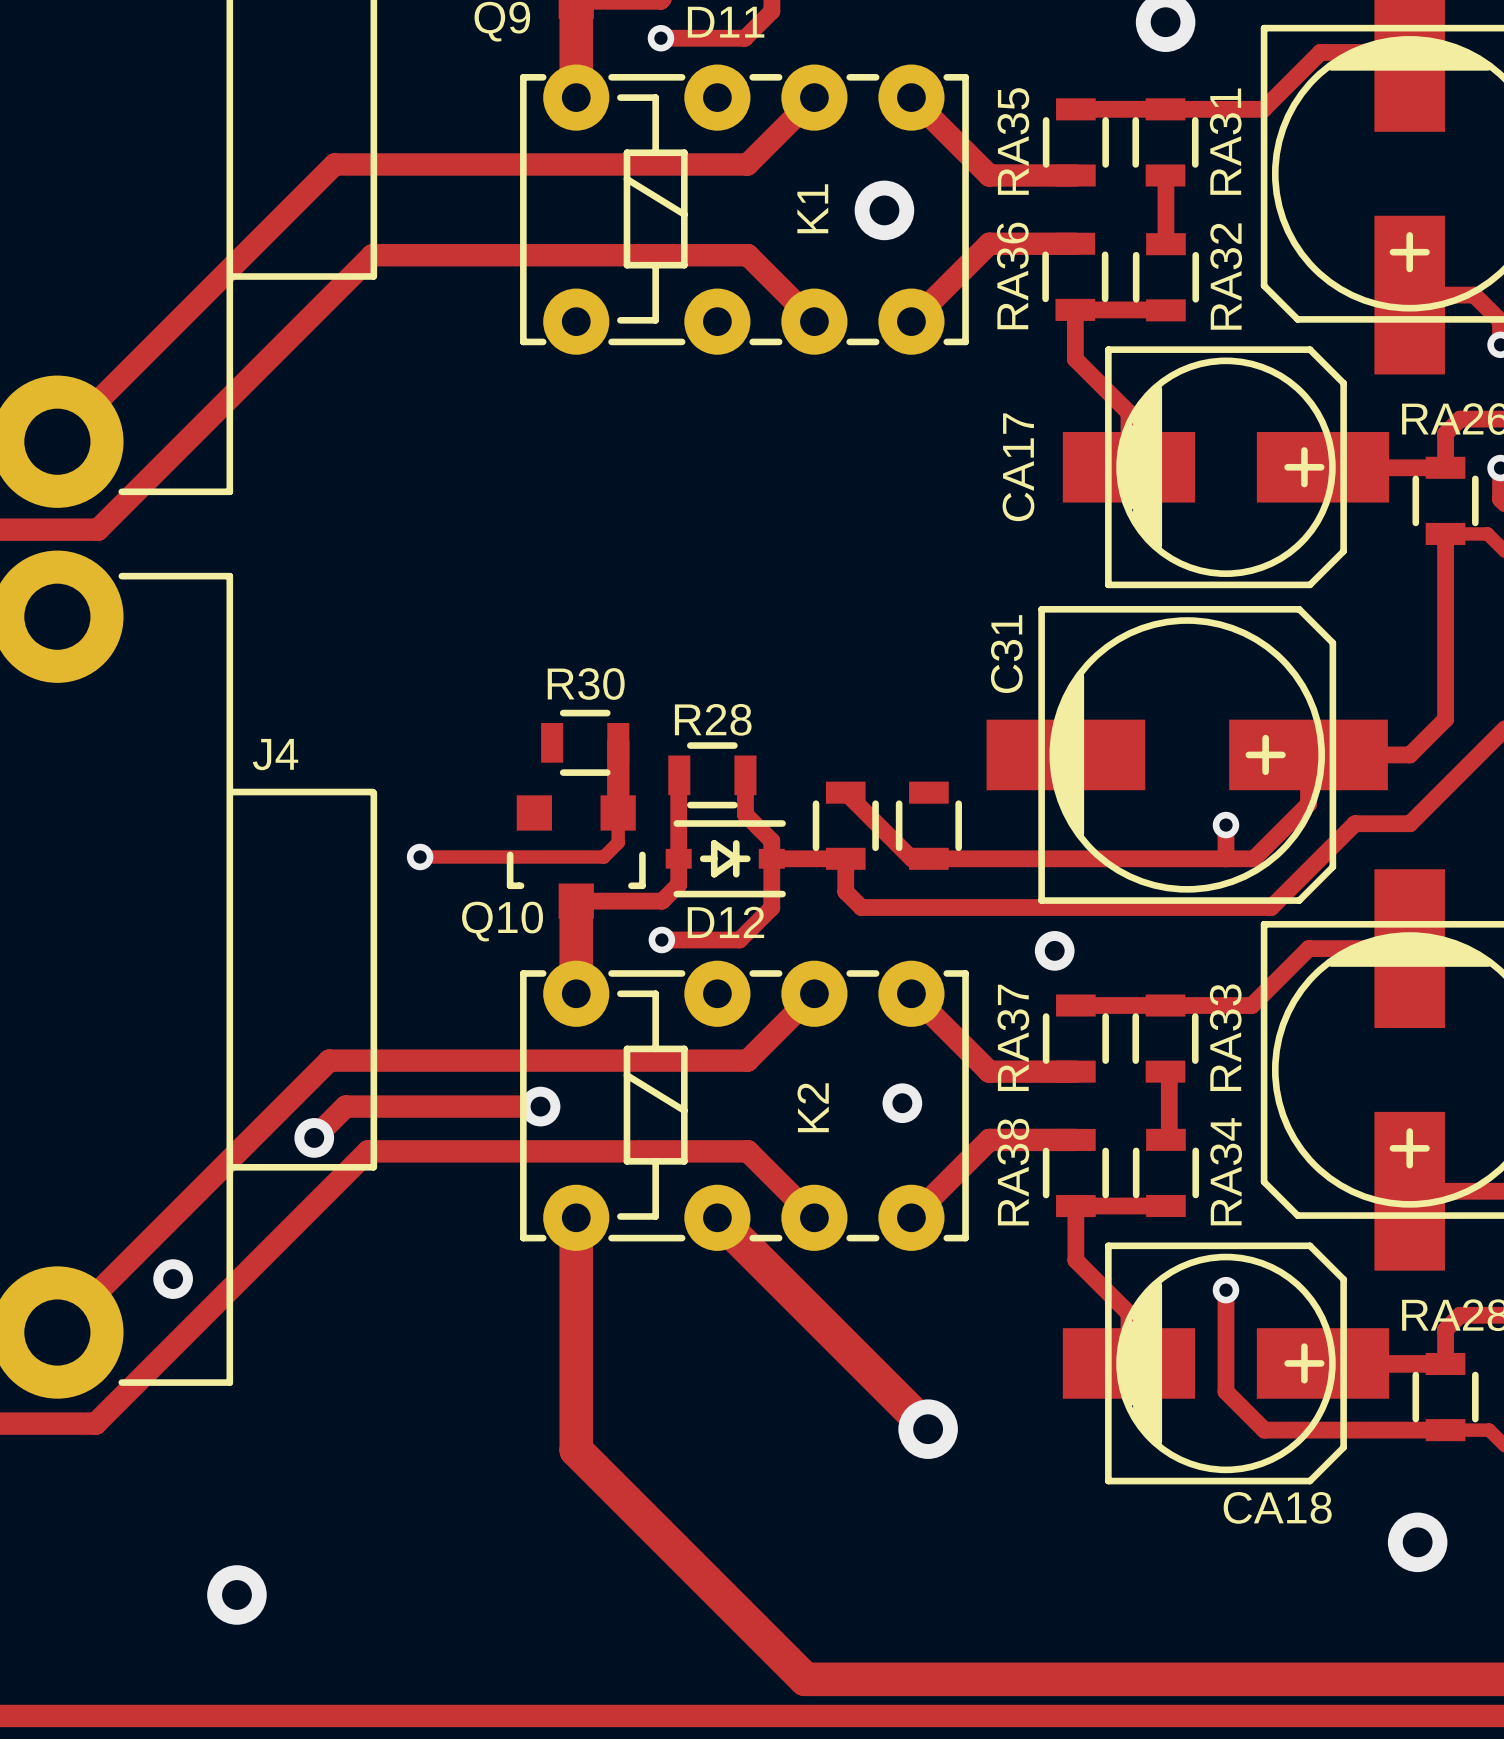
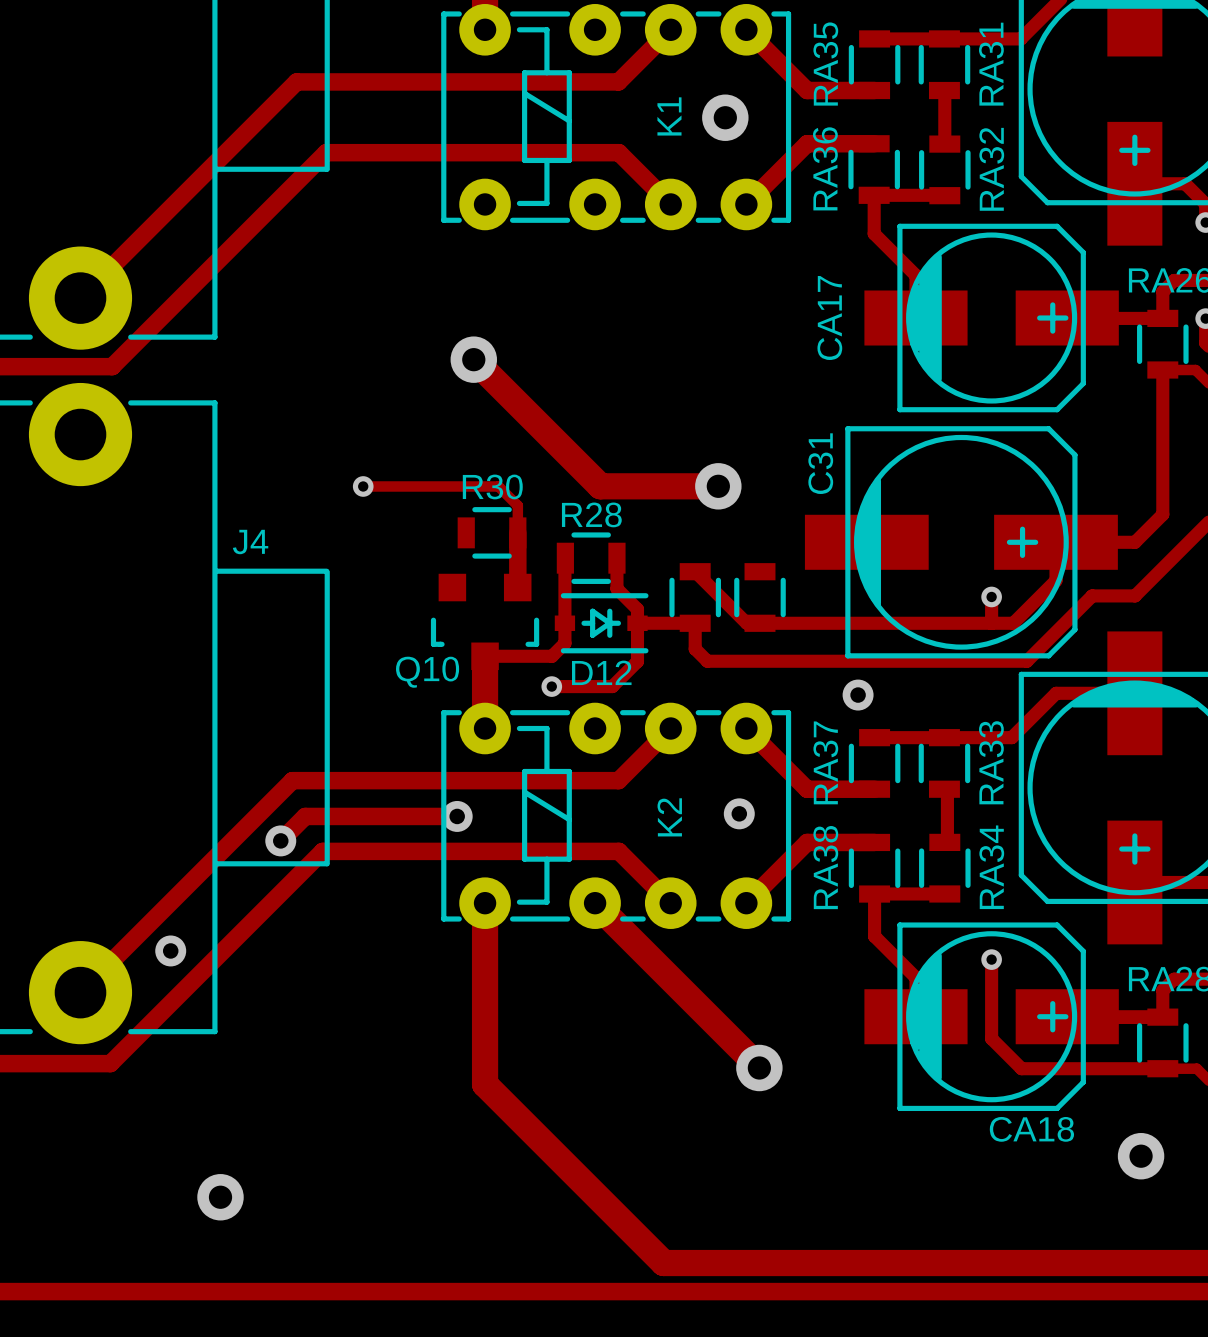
track: none -> (473, 359) (600, 486) (718, 486)
via: none -> (473, 359)
track: none -> (363, 486) (498, 486) (517, 505) (517, 532)
via: none -> (718, 486)
track: (618, 812) (618, 842) (603, 856) (420, 856) -> none
via position: (420, 856) -> (363, 486)

